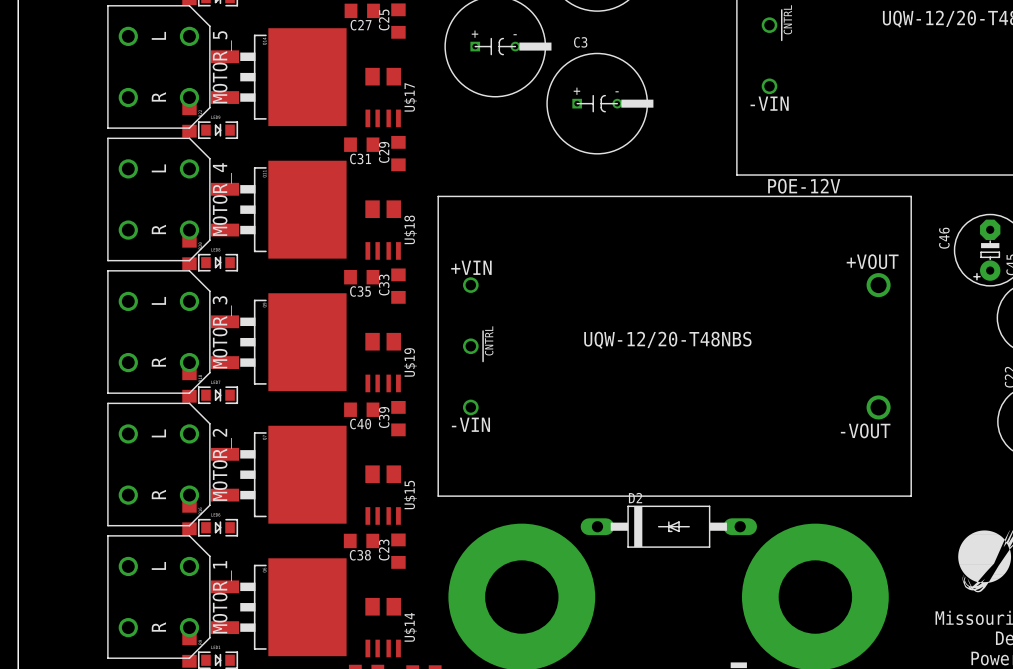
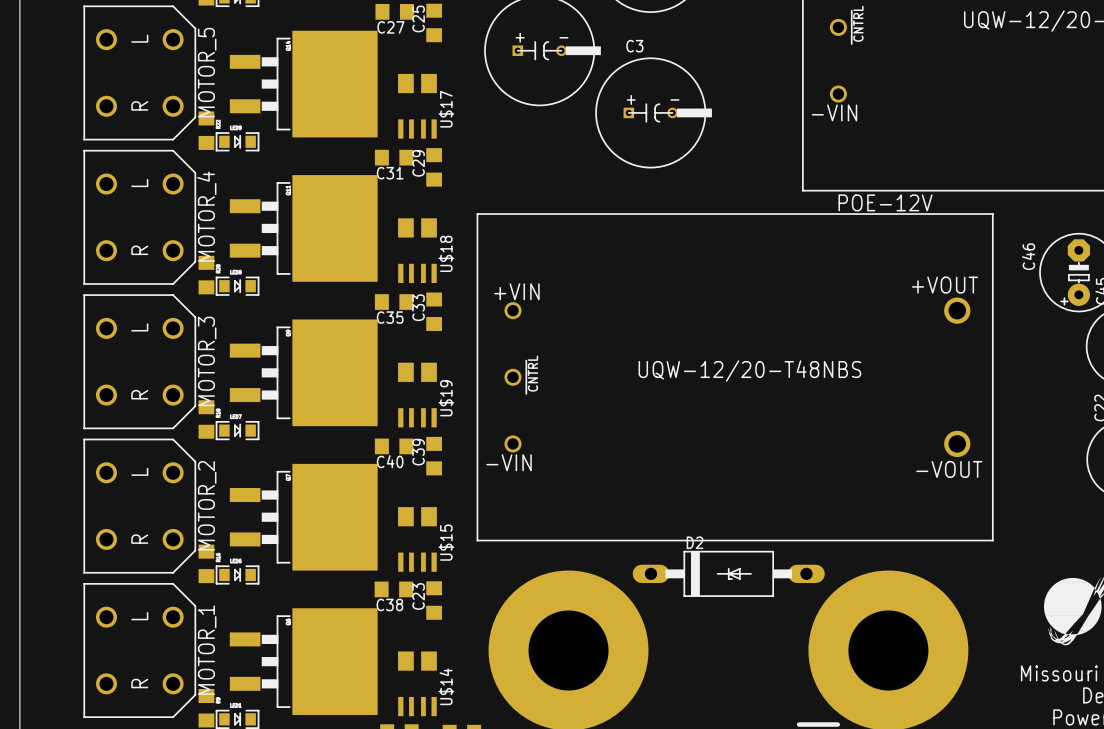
MOTOR_5 position: (158, 66) -> (139, 72)
MOTOR_4 position: (158, 199) -> (139, 217)
MOTOR_3 position: (158, 332) -> (139, 361)
MOTOR_2 position: (158, 464) -> (139, 506)
MOTOR_1 position: (158, 597) -> (139, 650)

